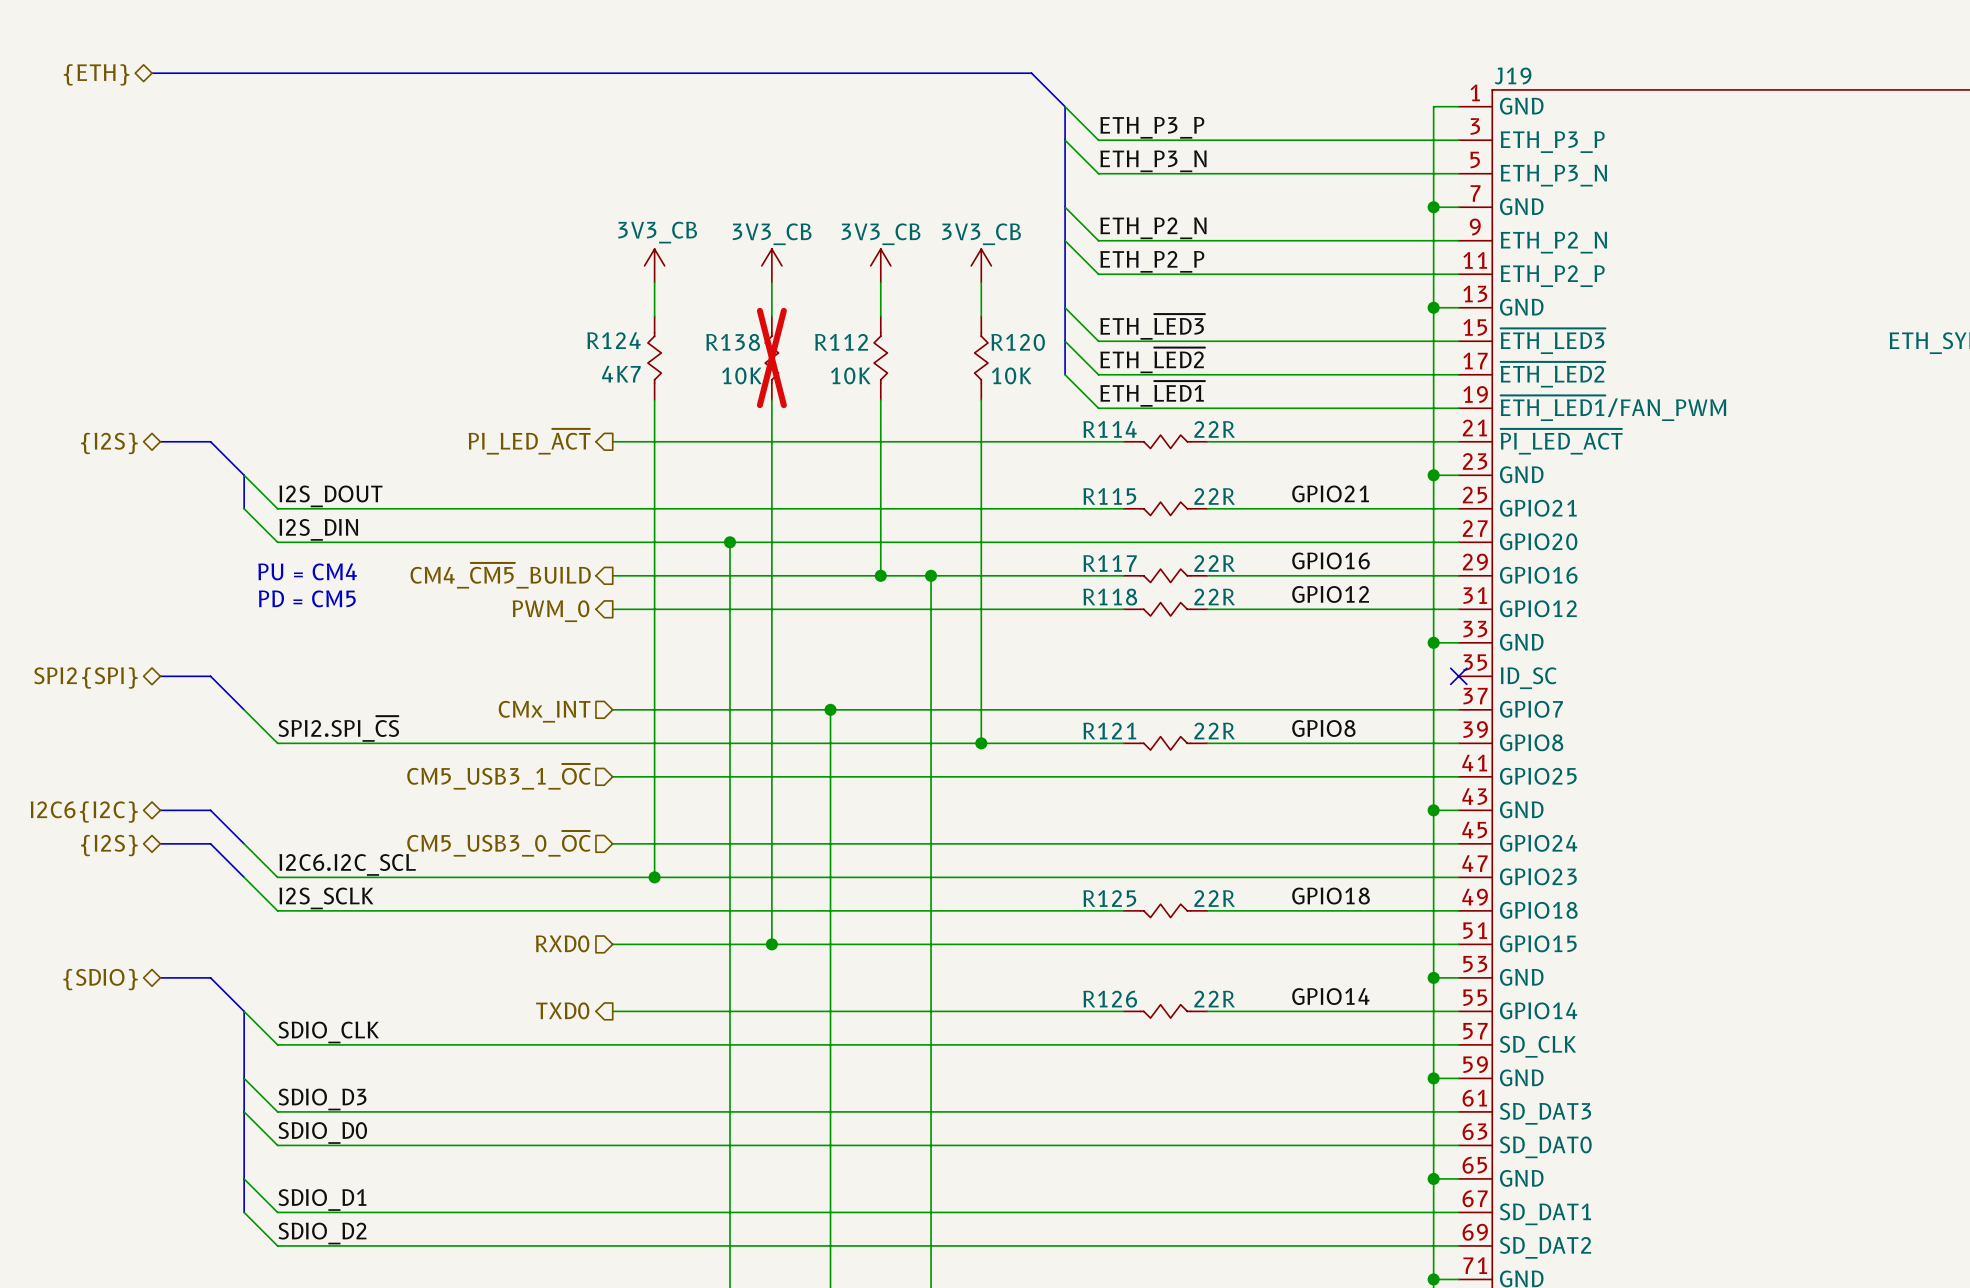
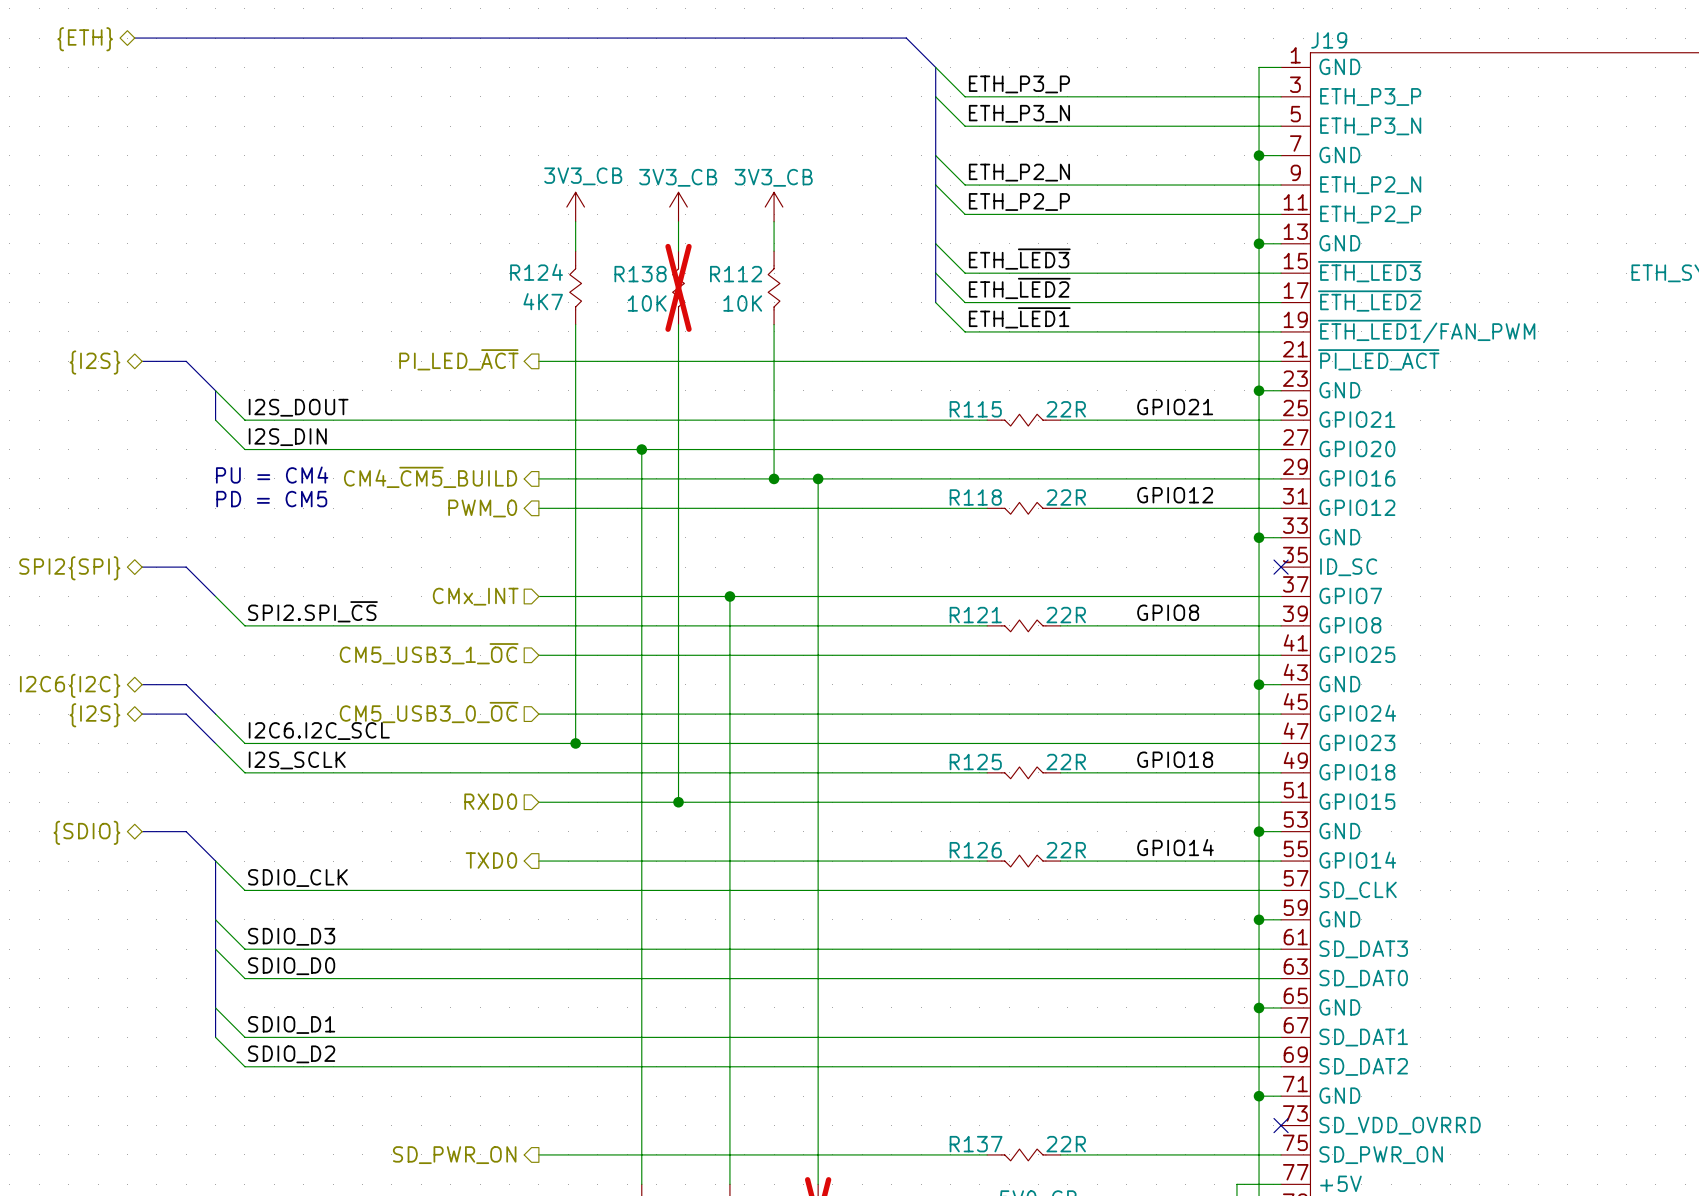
power symbol: 3V3_CB (981, 265) -> none
wire: (981, 282) (981, 316) -> none
R120: 10K (981, 358) -> none
wire: (981, 399) (981, 743) -> none
R114: 22R (1165, 441) -> none
label: GPIO16 (1331, 560) -> none
R117: 22R (1165, 575) -> none
junction: (981, 743) -> none

